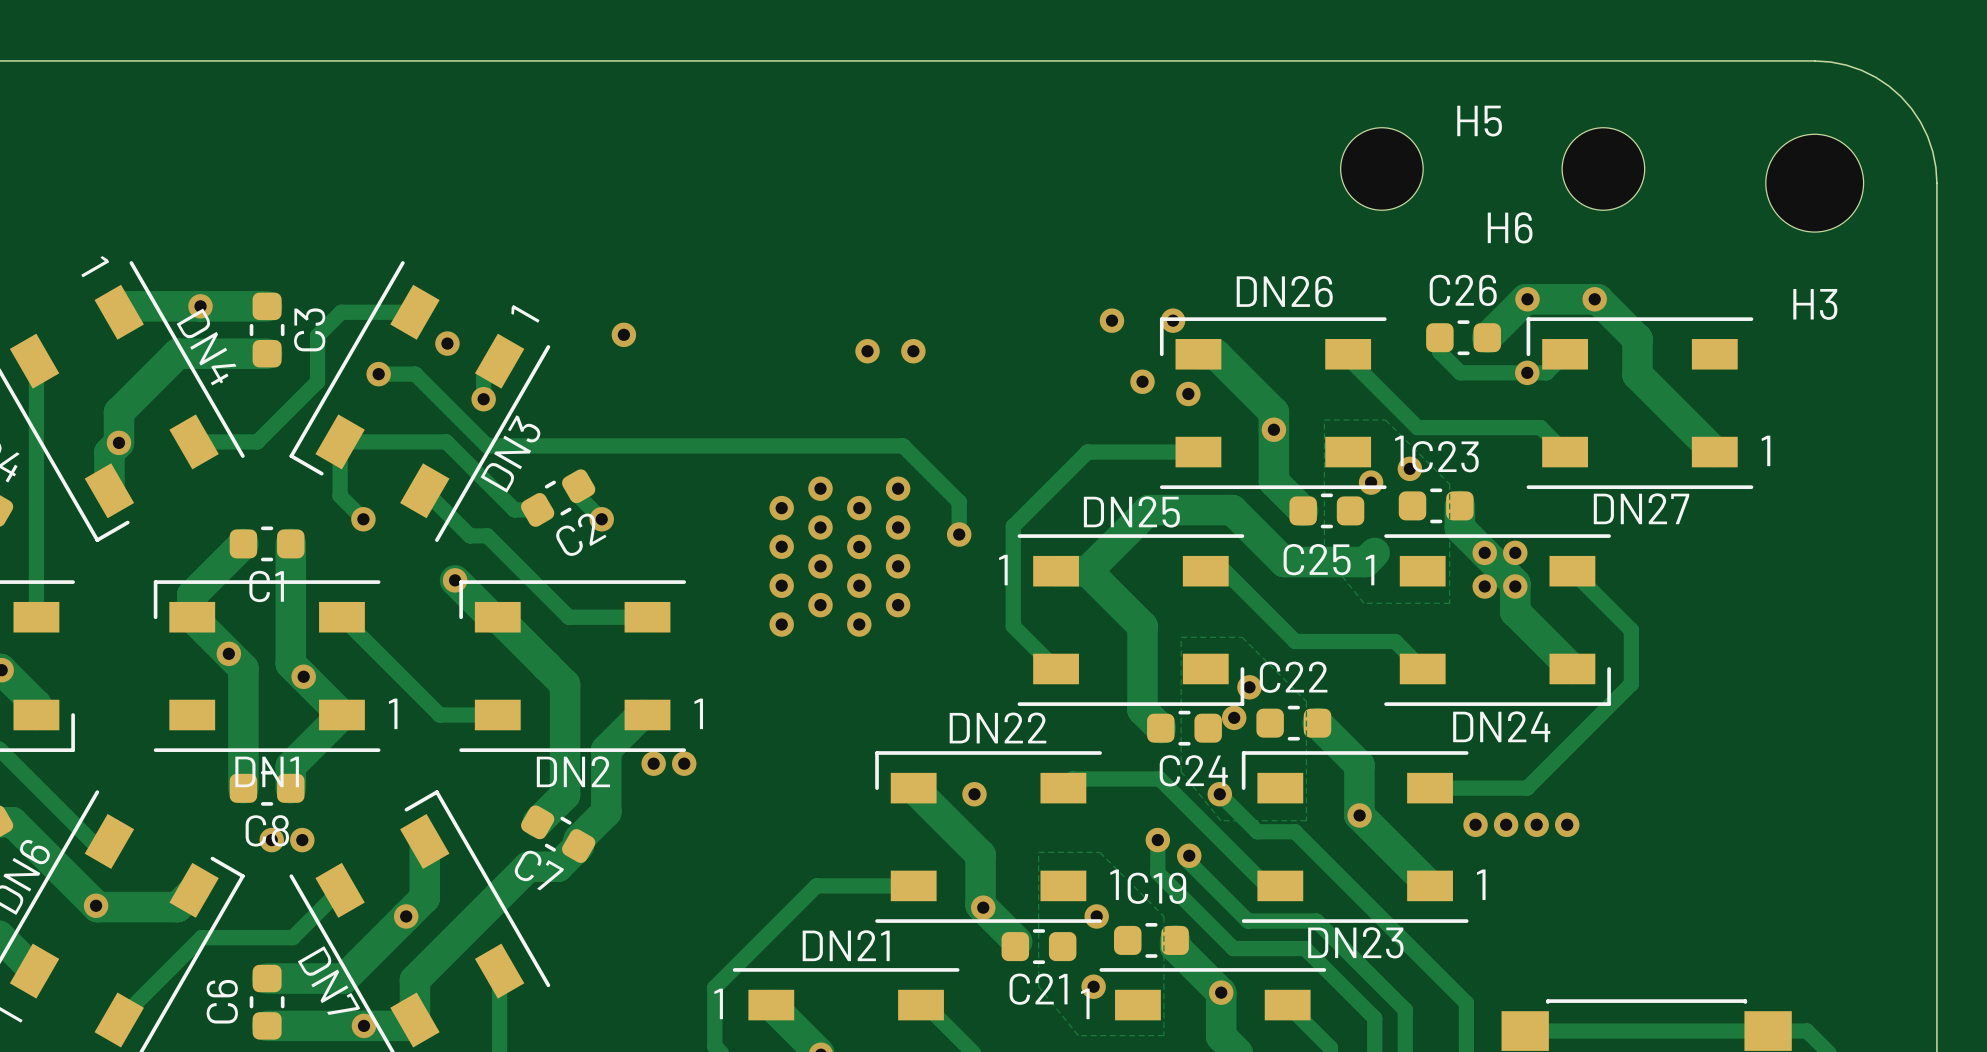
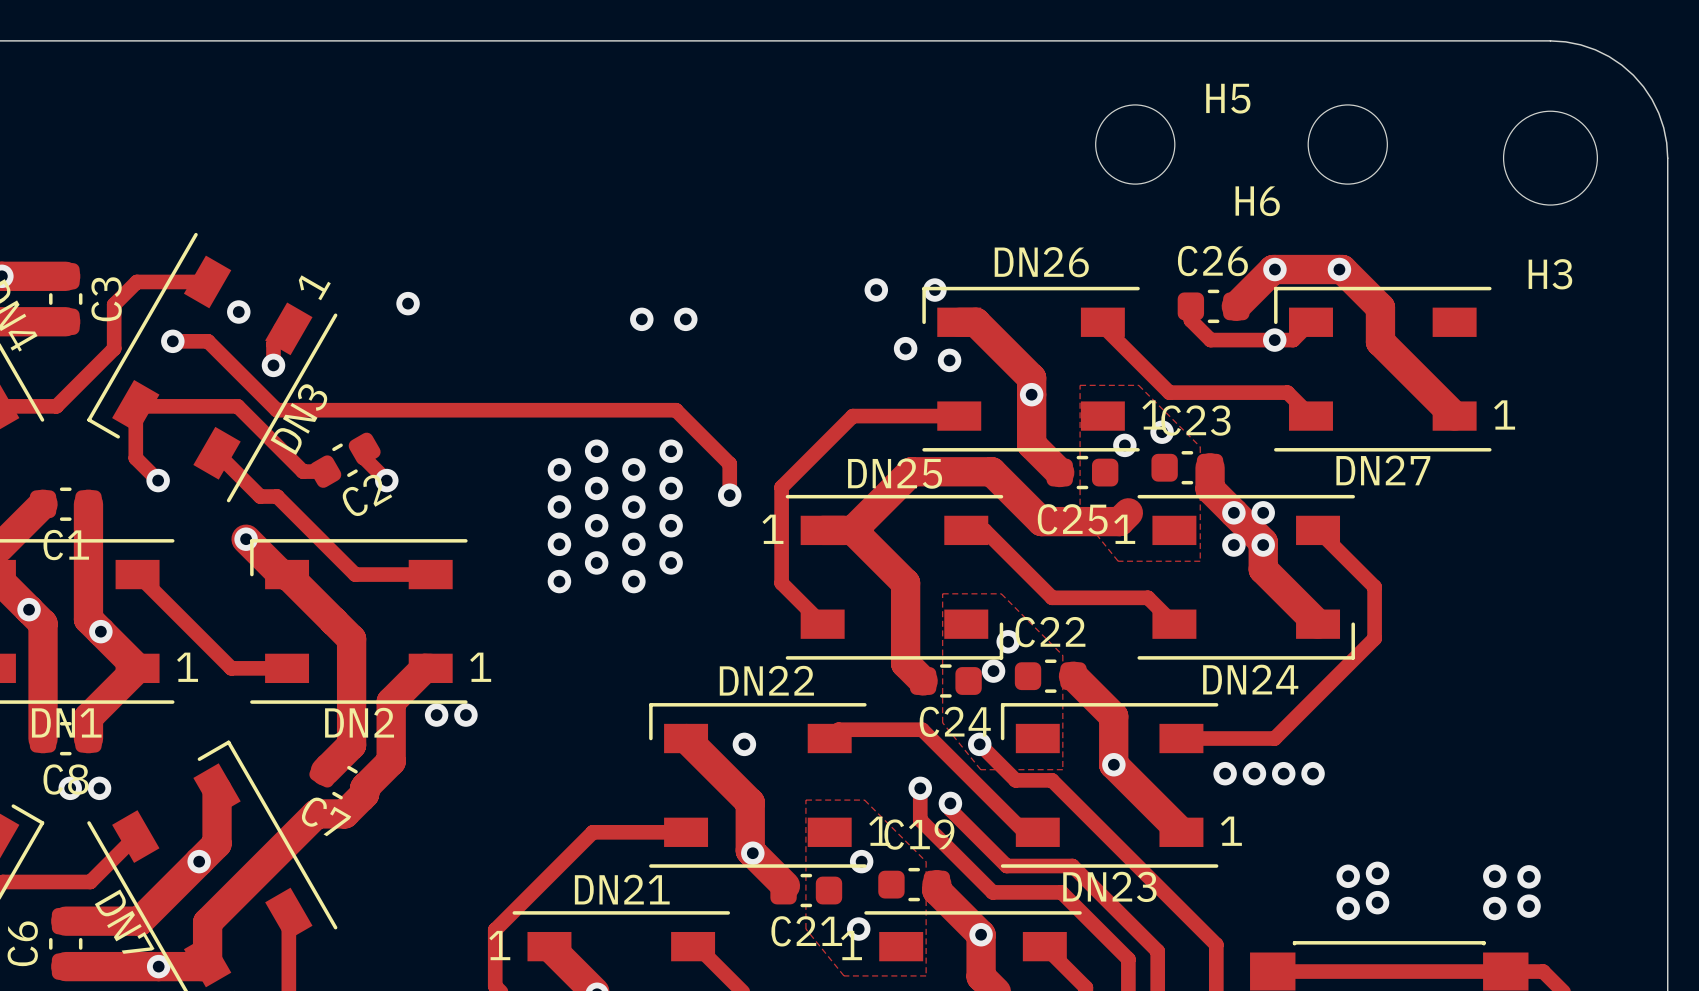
via: none -> (1377, 873)
via: none -> (1348, 876)
via: none -> (1494, 876)
via: none -> (1529, 876)
via: none -> (1377, 902)
via: none -> (1529, 906)
via: none -> (1348, 908)
via: none -> (1494, 908)

